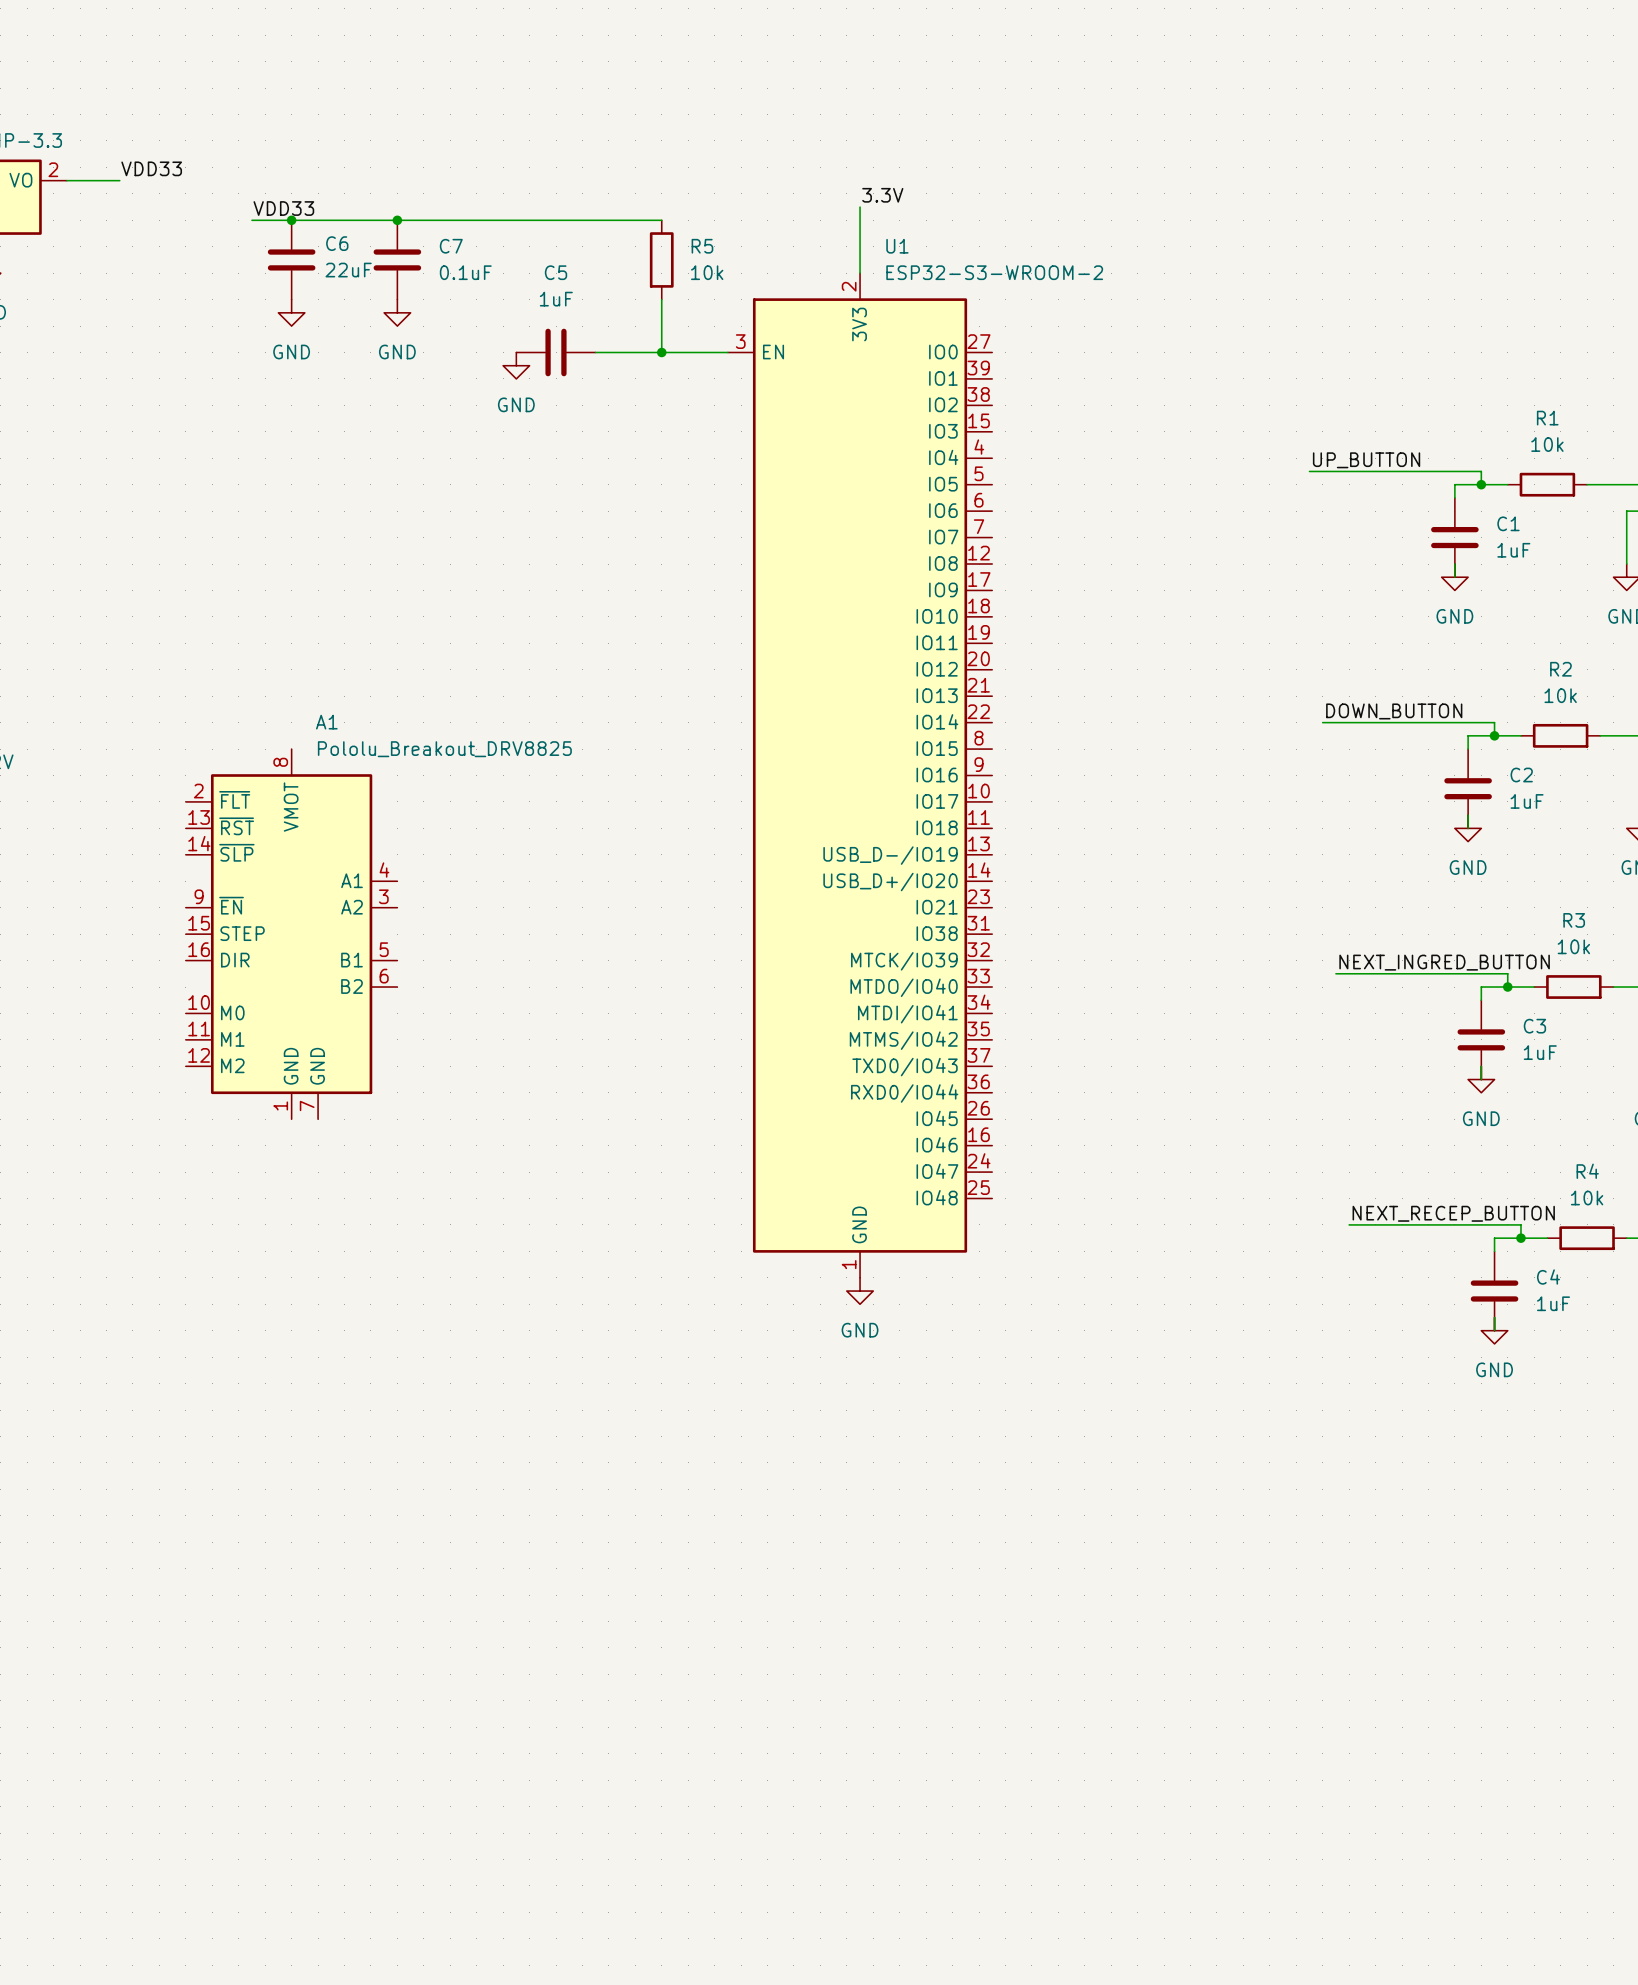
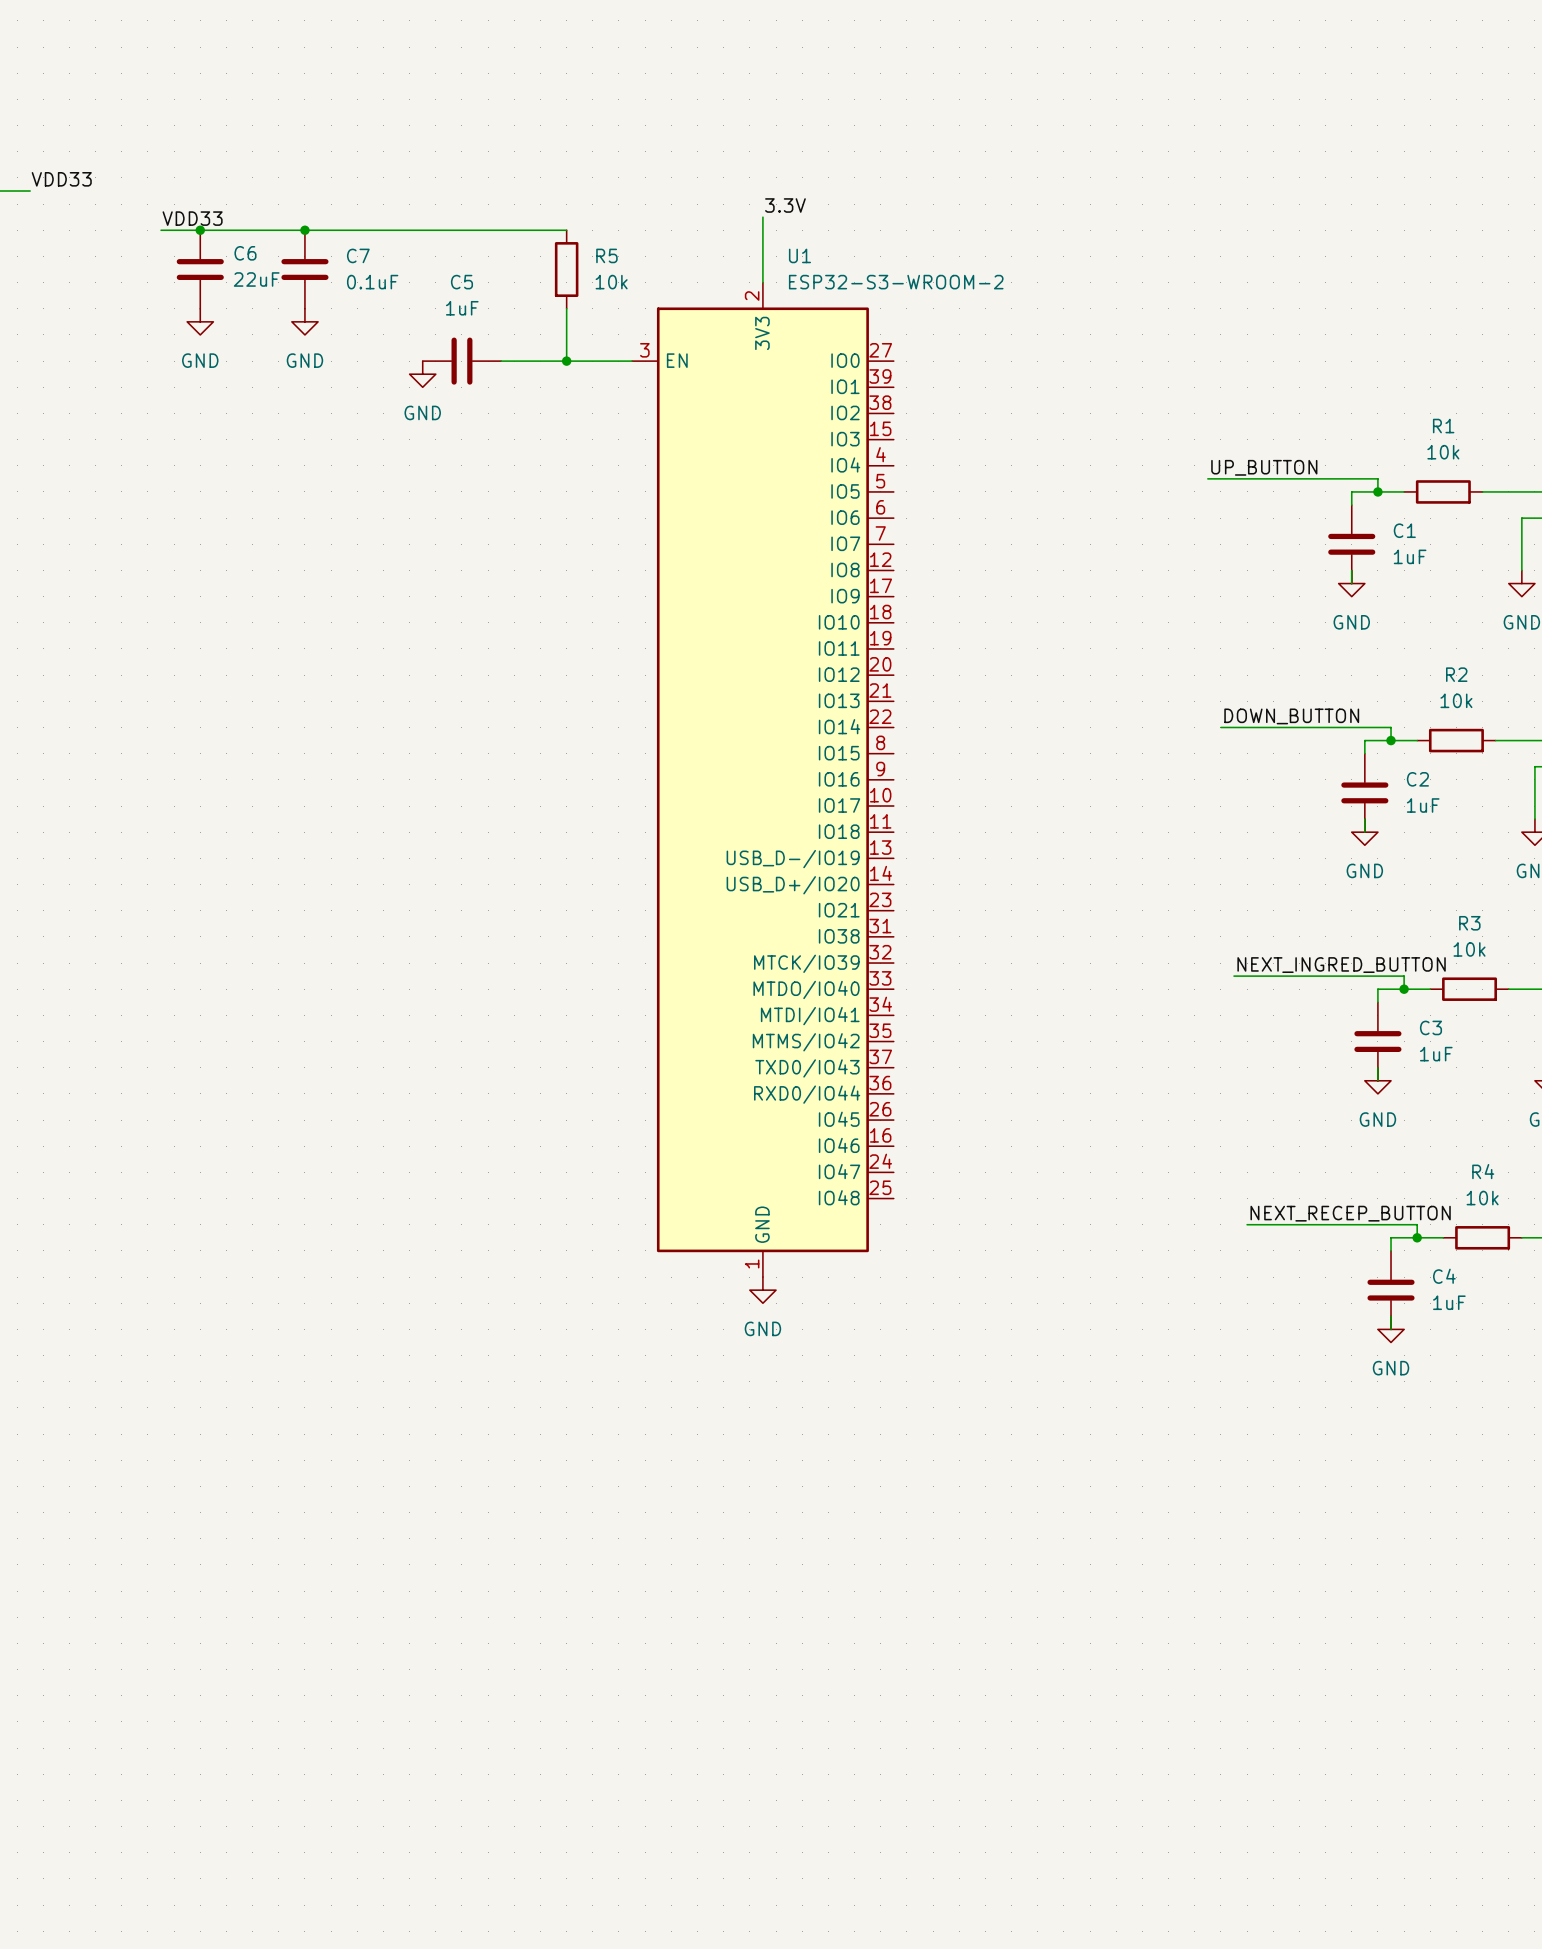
A1: Pololu_Breakout_DRV8825 (291, 934) -> none

